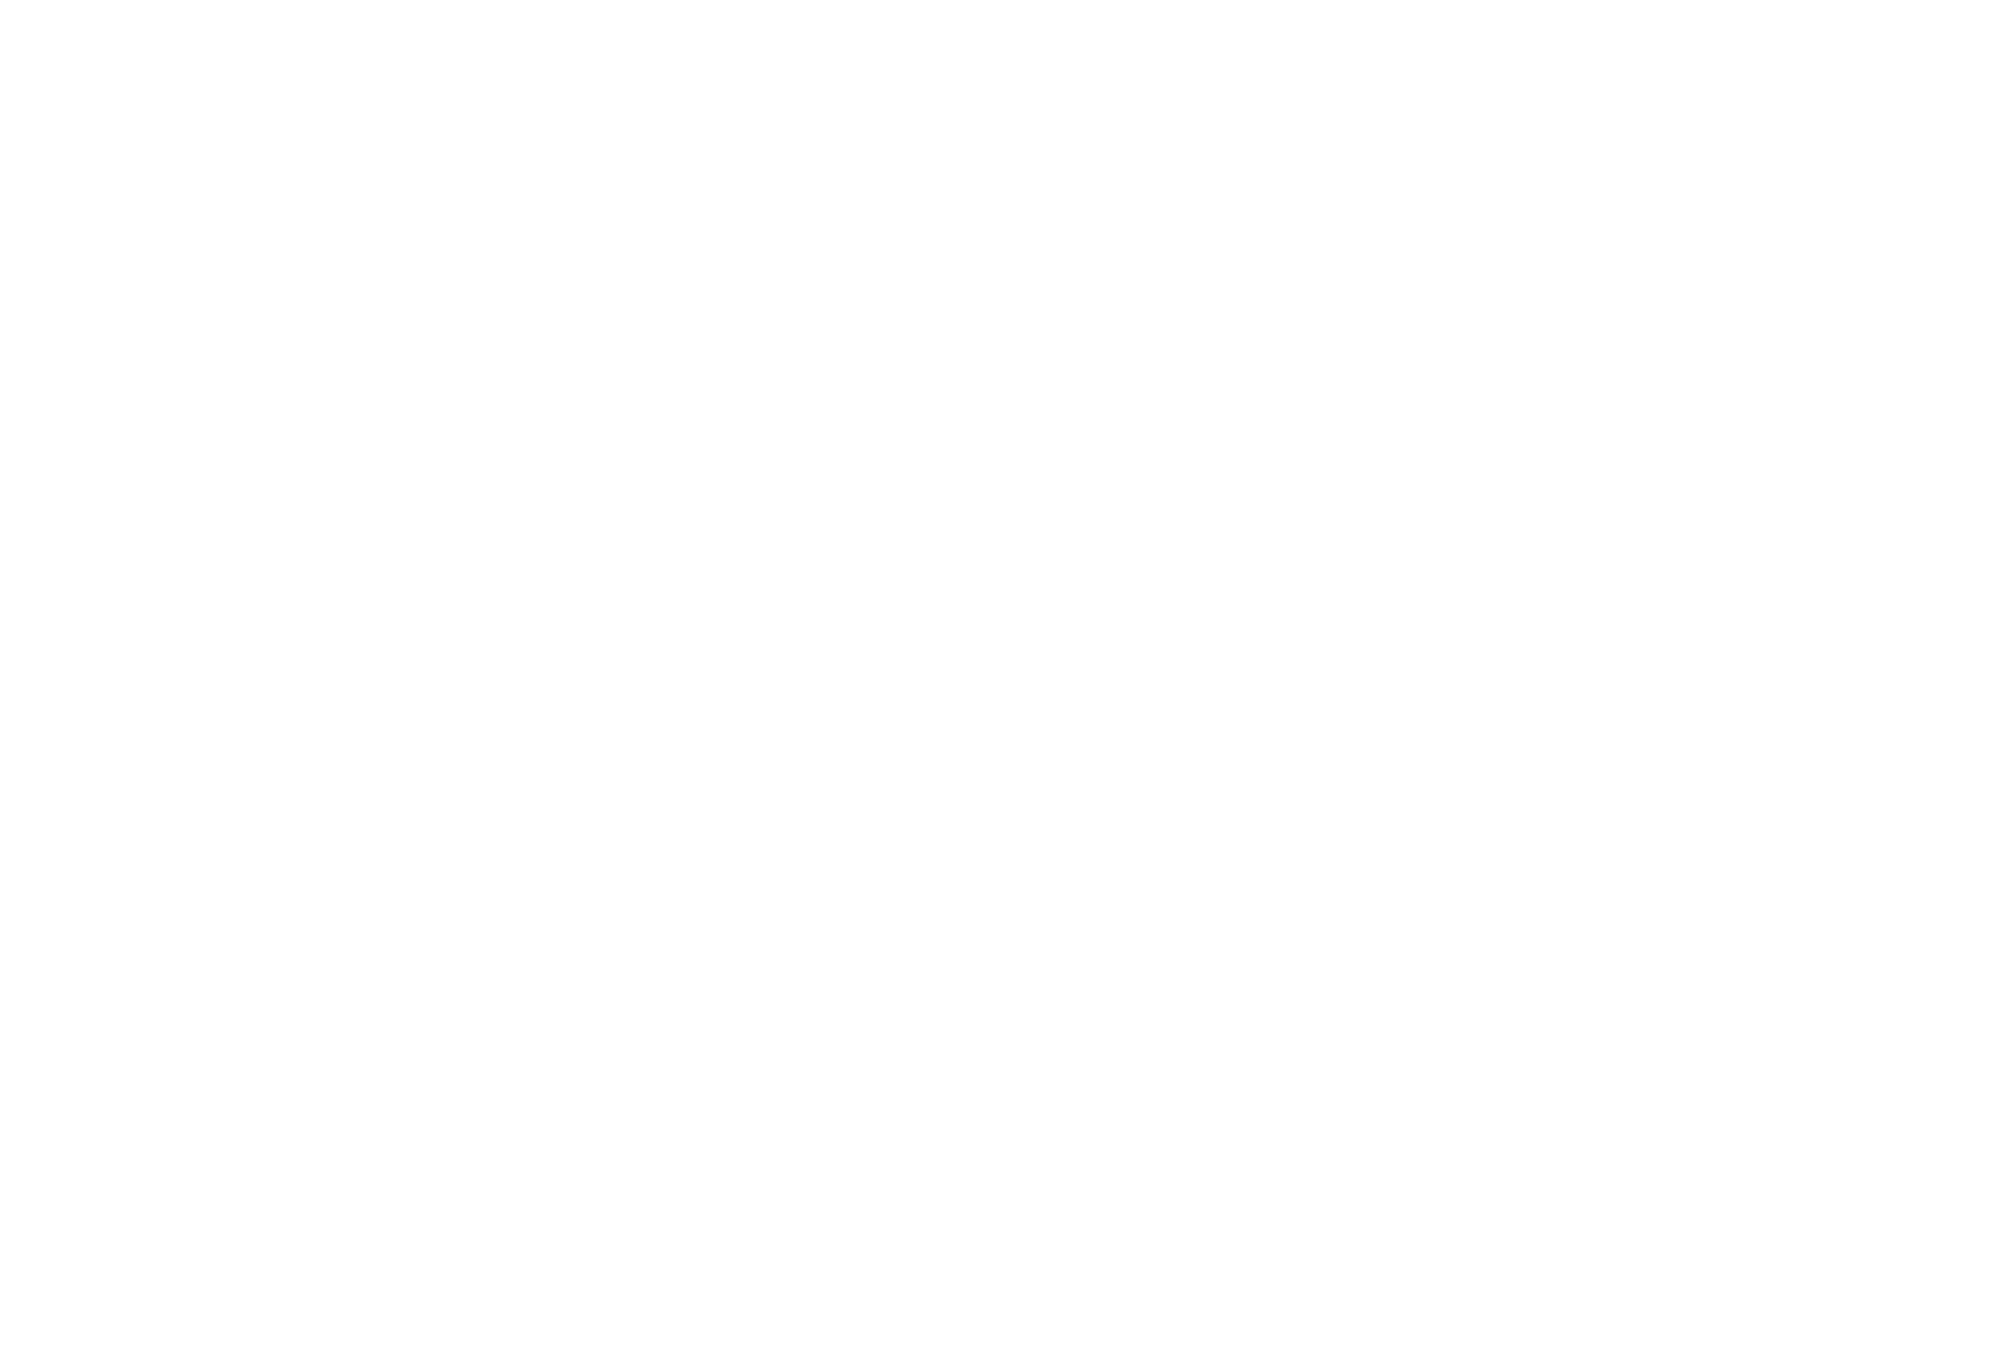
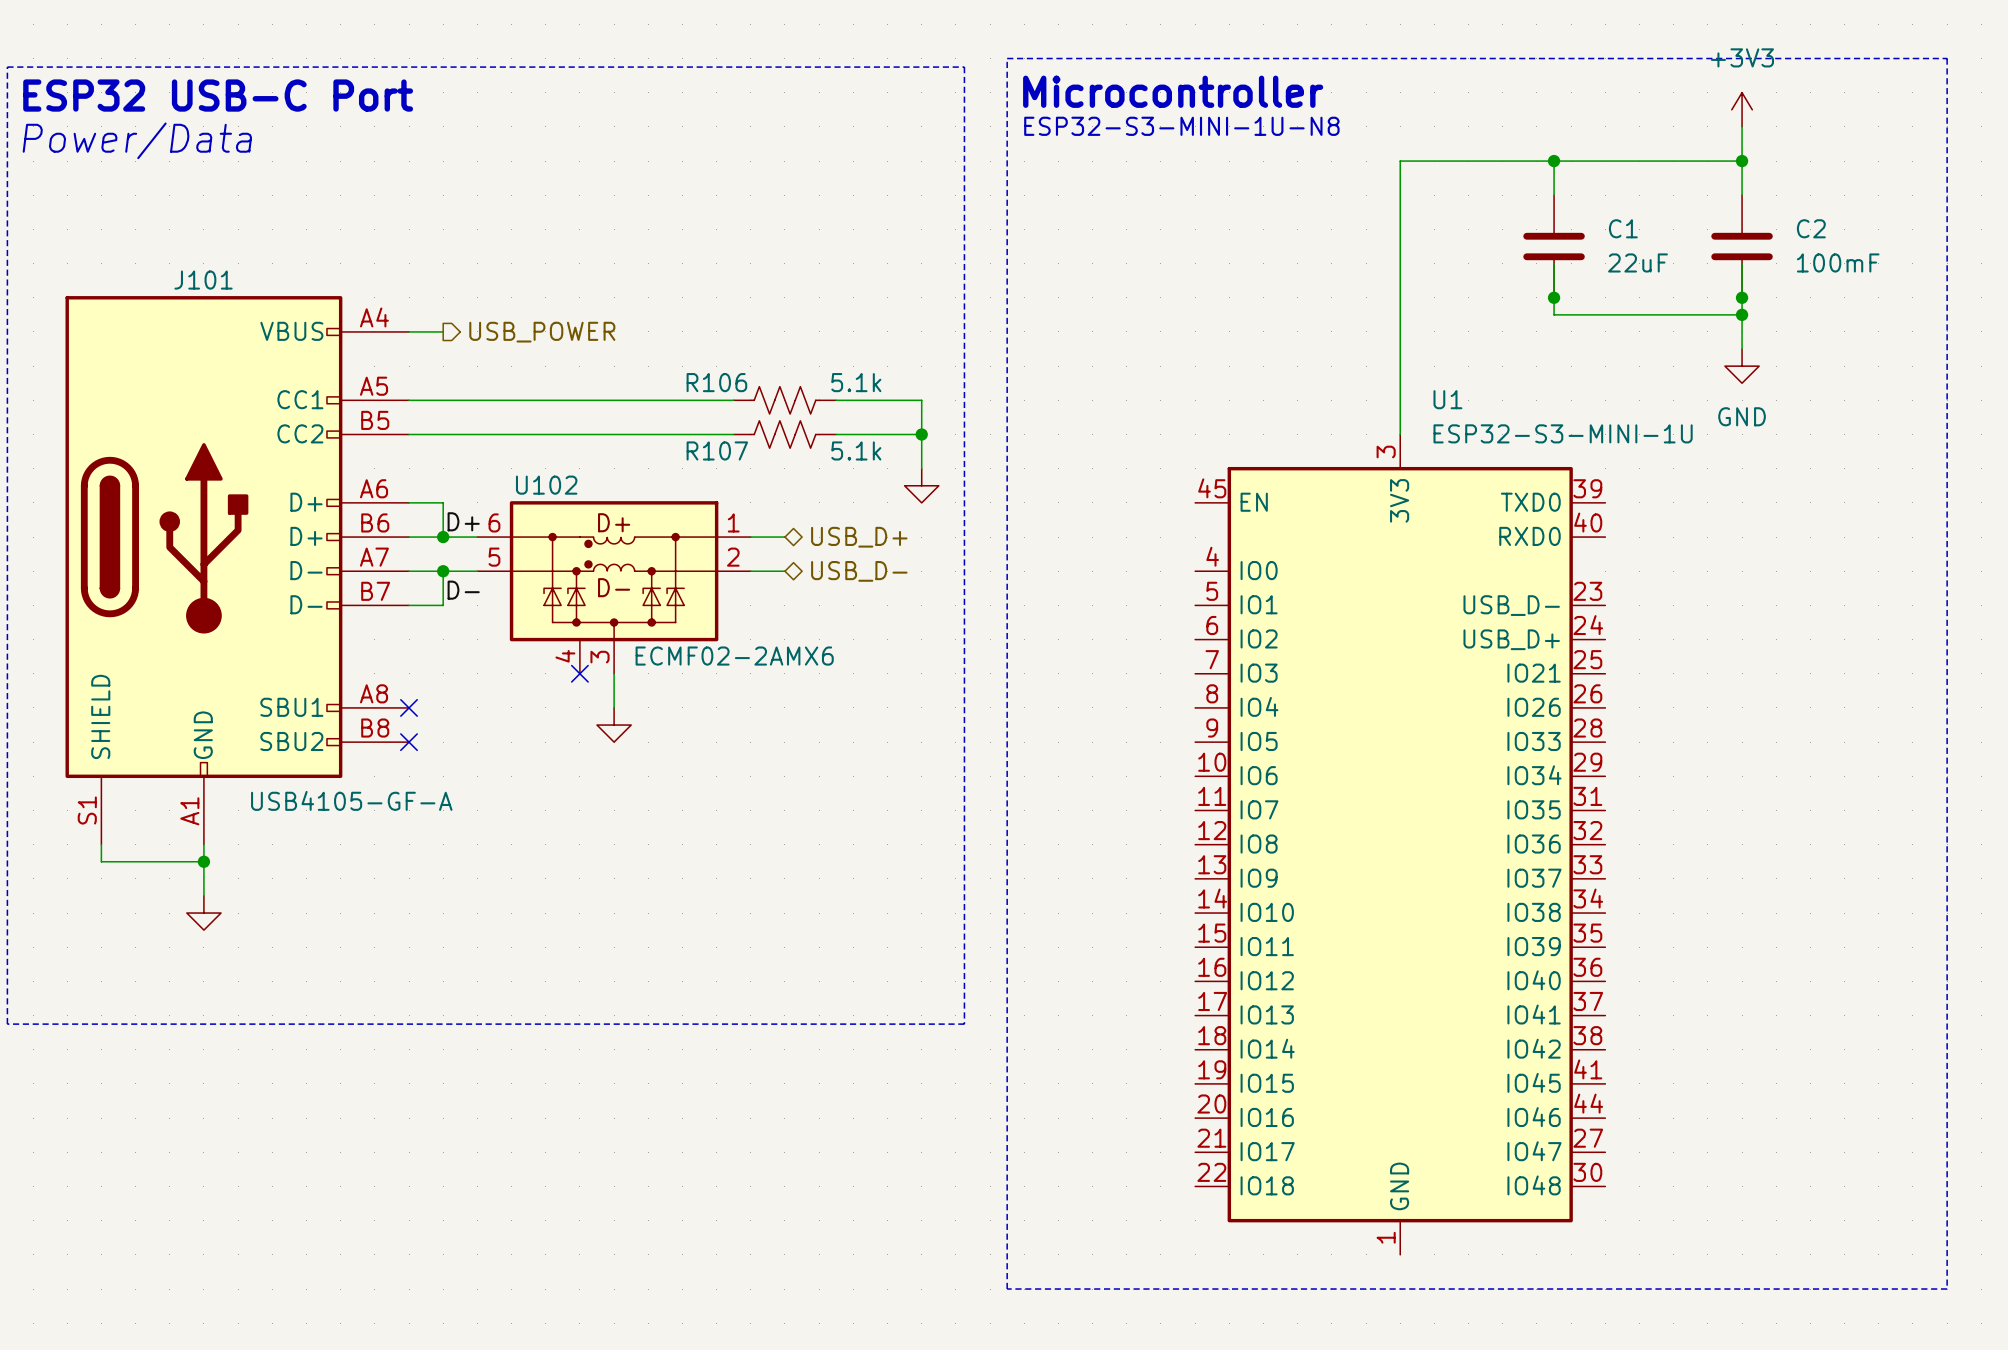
line: none -> (1007, 58) (1947, 58) (1947, 1289) (1007, 1289) (1007, 58)
line: none -> (7, 67) (964, 67) (964, 1024) (7, 1024) (7, 67)
text: none -> Microcontroller (1173, 91)
text: none -> ESP32 USB-C Port (218, 95)
power symbol: none -> +3V3 (1742, 109)
text: none -> ESP32-S3-MINI-1U-N8 (1181, 126)
wire: none -> (1742, 126) (1742, 195)
text: none -> Power/Data (137, 140)
wire: none -> (1554, 161) (1554, 195)
junction: none -> (1554, 161)
wire: none -> (1742, 161) (1400, 161) (1400, 434)
junction: none -> (1742, 161)
C1: none -> 22uF (1554, 246)
C2: none -> 100mF (1742, 246)
wire: none -> (1554, 263) (1554, 314) (1742, 314)
wire: none -> (1742, 263) (1742, 349)
junction: none -> (1554, 297)
junction: none -> (1742, 297)
junction: none -> (1742, 314)
wire: none -> (409, 331) (443, 331)
hierarchical label: none -> USB_POWER (542, 332)
power symbol: none -> GND (1742, 366)
wire: none -> (409, 400) (733, 400)
R106: none -> 5.1k (784, 400)
wire: none -> (836, 400) (921, 400) (921, 468)
wire: none -> (409, 434) (733, 434)
R107: none -> 5.1k (784, 434)
wire: none -> (836, 434) (921, 434)
junction: none -> (921, 434)
power symbol: none -> (921, 485)
wire: none -> (409, 502) (443, 502) (443, 537)
label: none -> D+ (463, 521)
wire: none -> (409, 537) (477, 537)
junction: none -> (443, 537)
wire: none -> (750, 537) (784, 537)
hierarchical label: none -> USB_D+ (859, 537)
J101: none -> USB4105-GF-A (237, 570)
wire: none -> (409, 571) (477, 571)
wire: none -> (443, 571) (443, 605) (409, 605)
junction: none -> (443, 571)
wire: none -> (750, 571) (784, 571)
hierarchical label: none -> USB_D- (859, 571)
U102: none -> ECMF02-2AMX6 (614, 587)
label: none -> D- (463, 590)
no-connect mark: none -> (579, 673)
wire: none -> (614, 673) (614, 707)
no-connect mark: none -> (409, 707)
power symbol: none -> (614, 725)
no-connect mark: none -> (409, 742)
wire: none -> (101, 844) (101, 861) (203, 861)
wire: none -> (203, 844) (203, 895)
U1: none -> ESP32-S3-MINI-1U (1400, 844)
junction: none -> (203, 861)
power symbol: none -> (203, 913)

